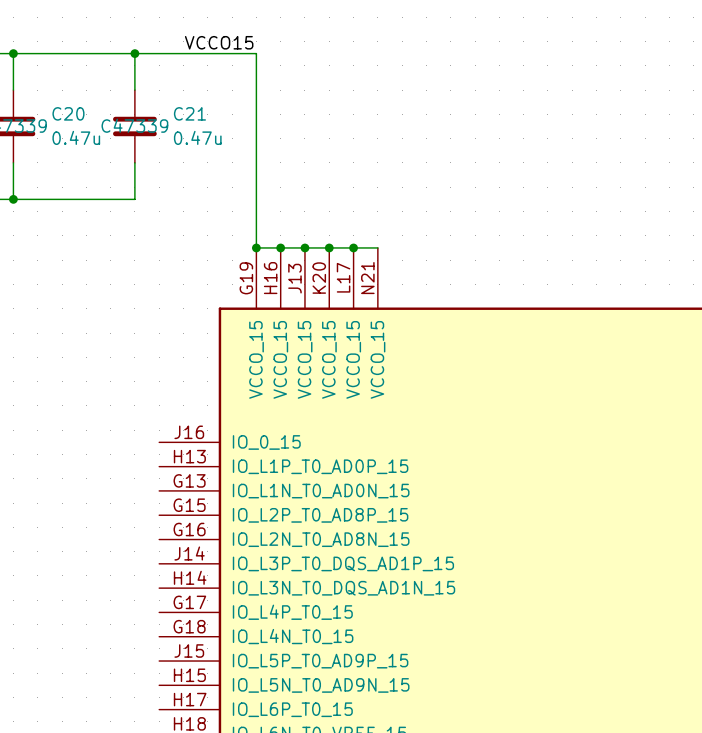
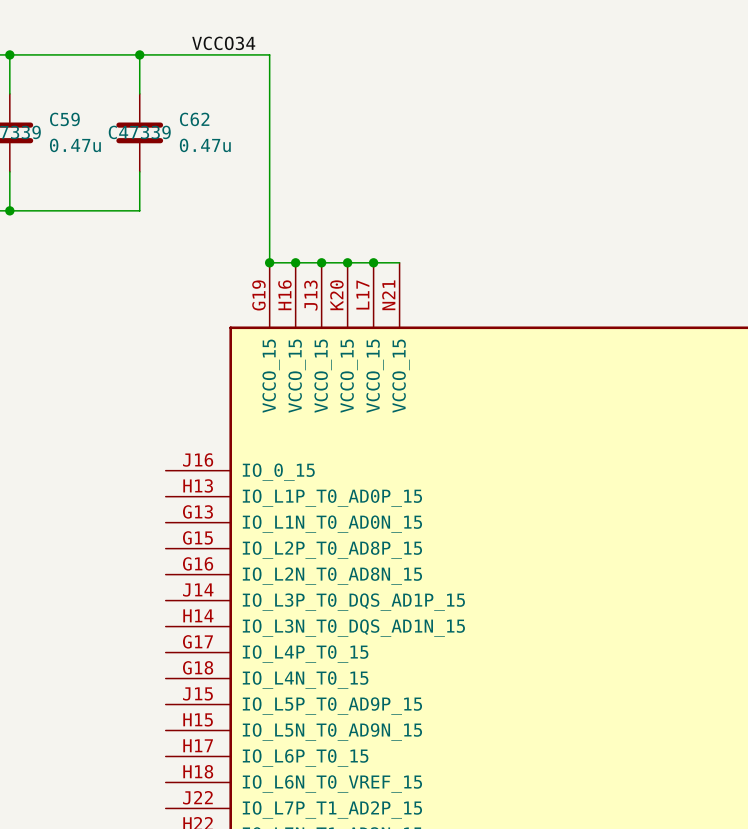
label: VCCO15 (219, 42) -> VCCO34 (223, 43)
C20 name: C20 (68, 113) -> C59 (64, 119)
C21 name: C21 (189, 113) -> C62 (194, 119)

